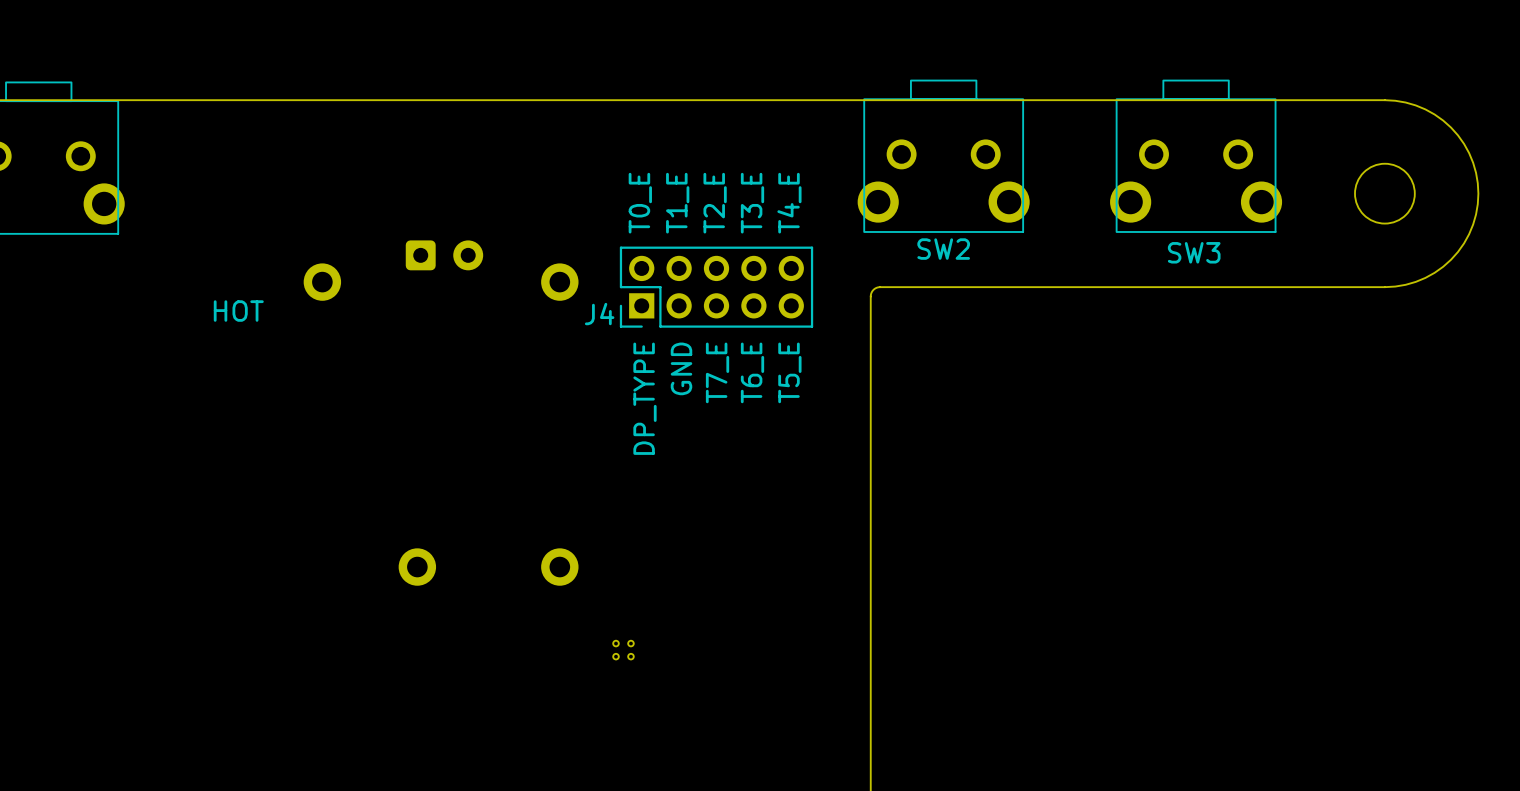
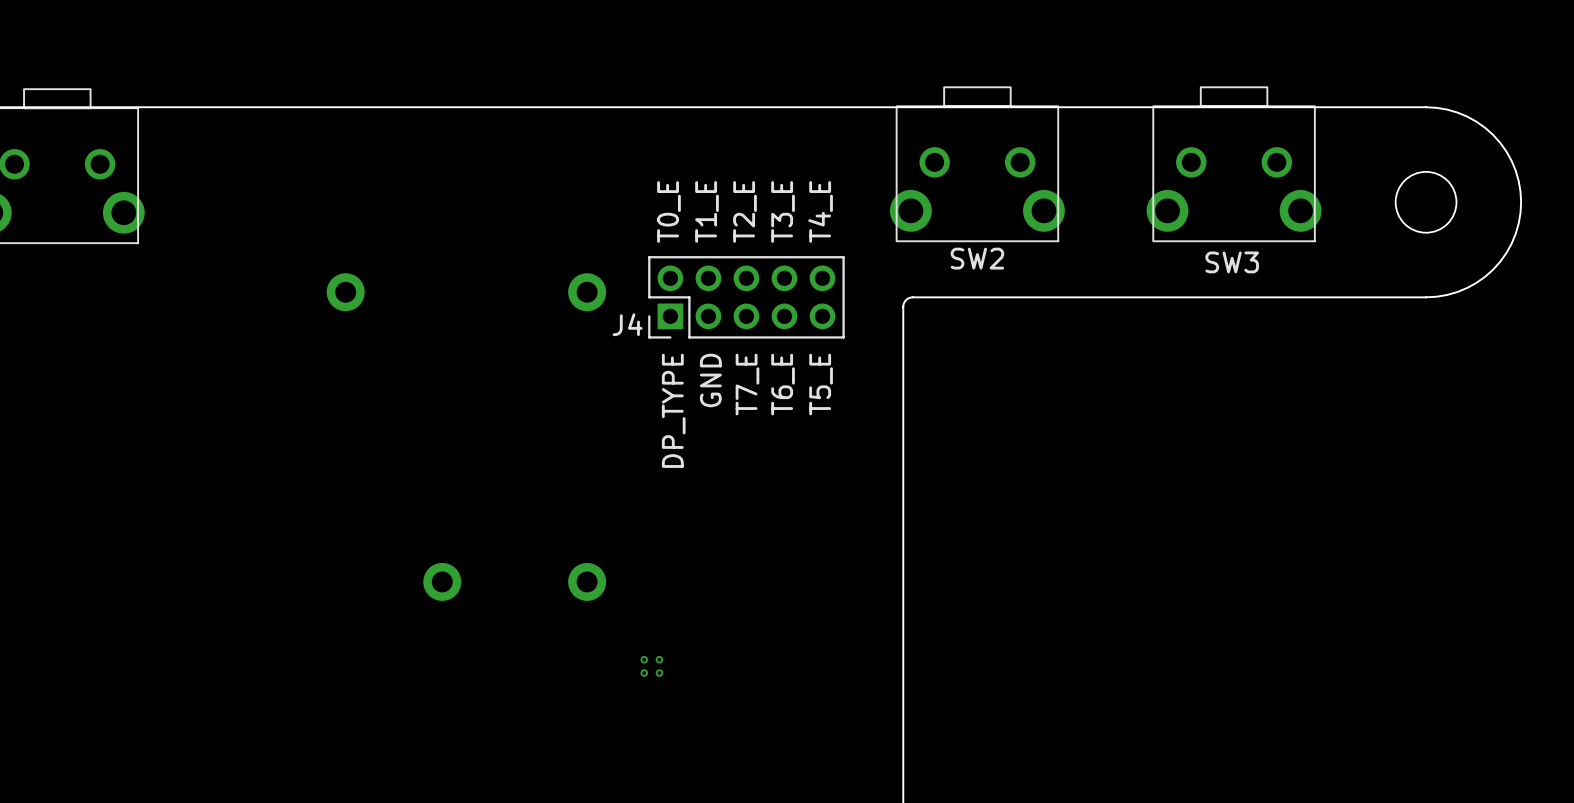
part: (444, 255) -> none
text: HOT (238, 311) -> none

